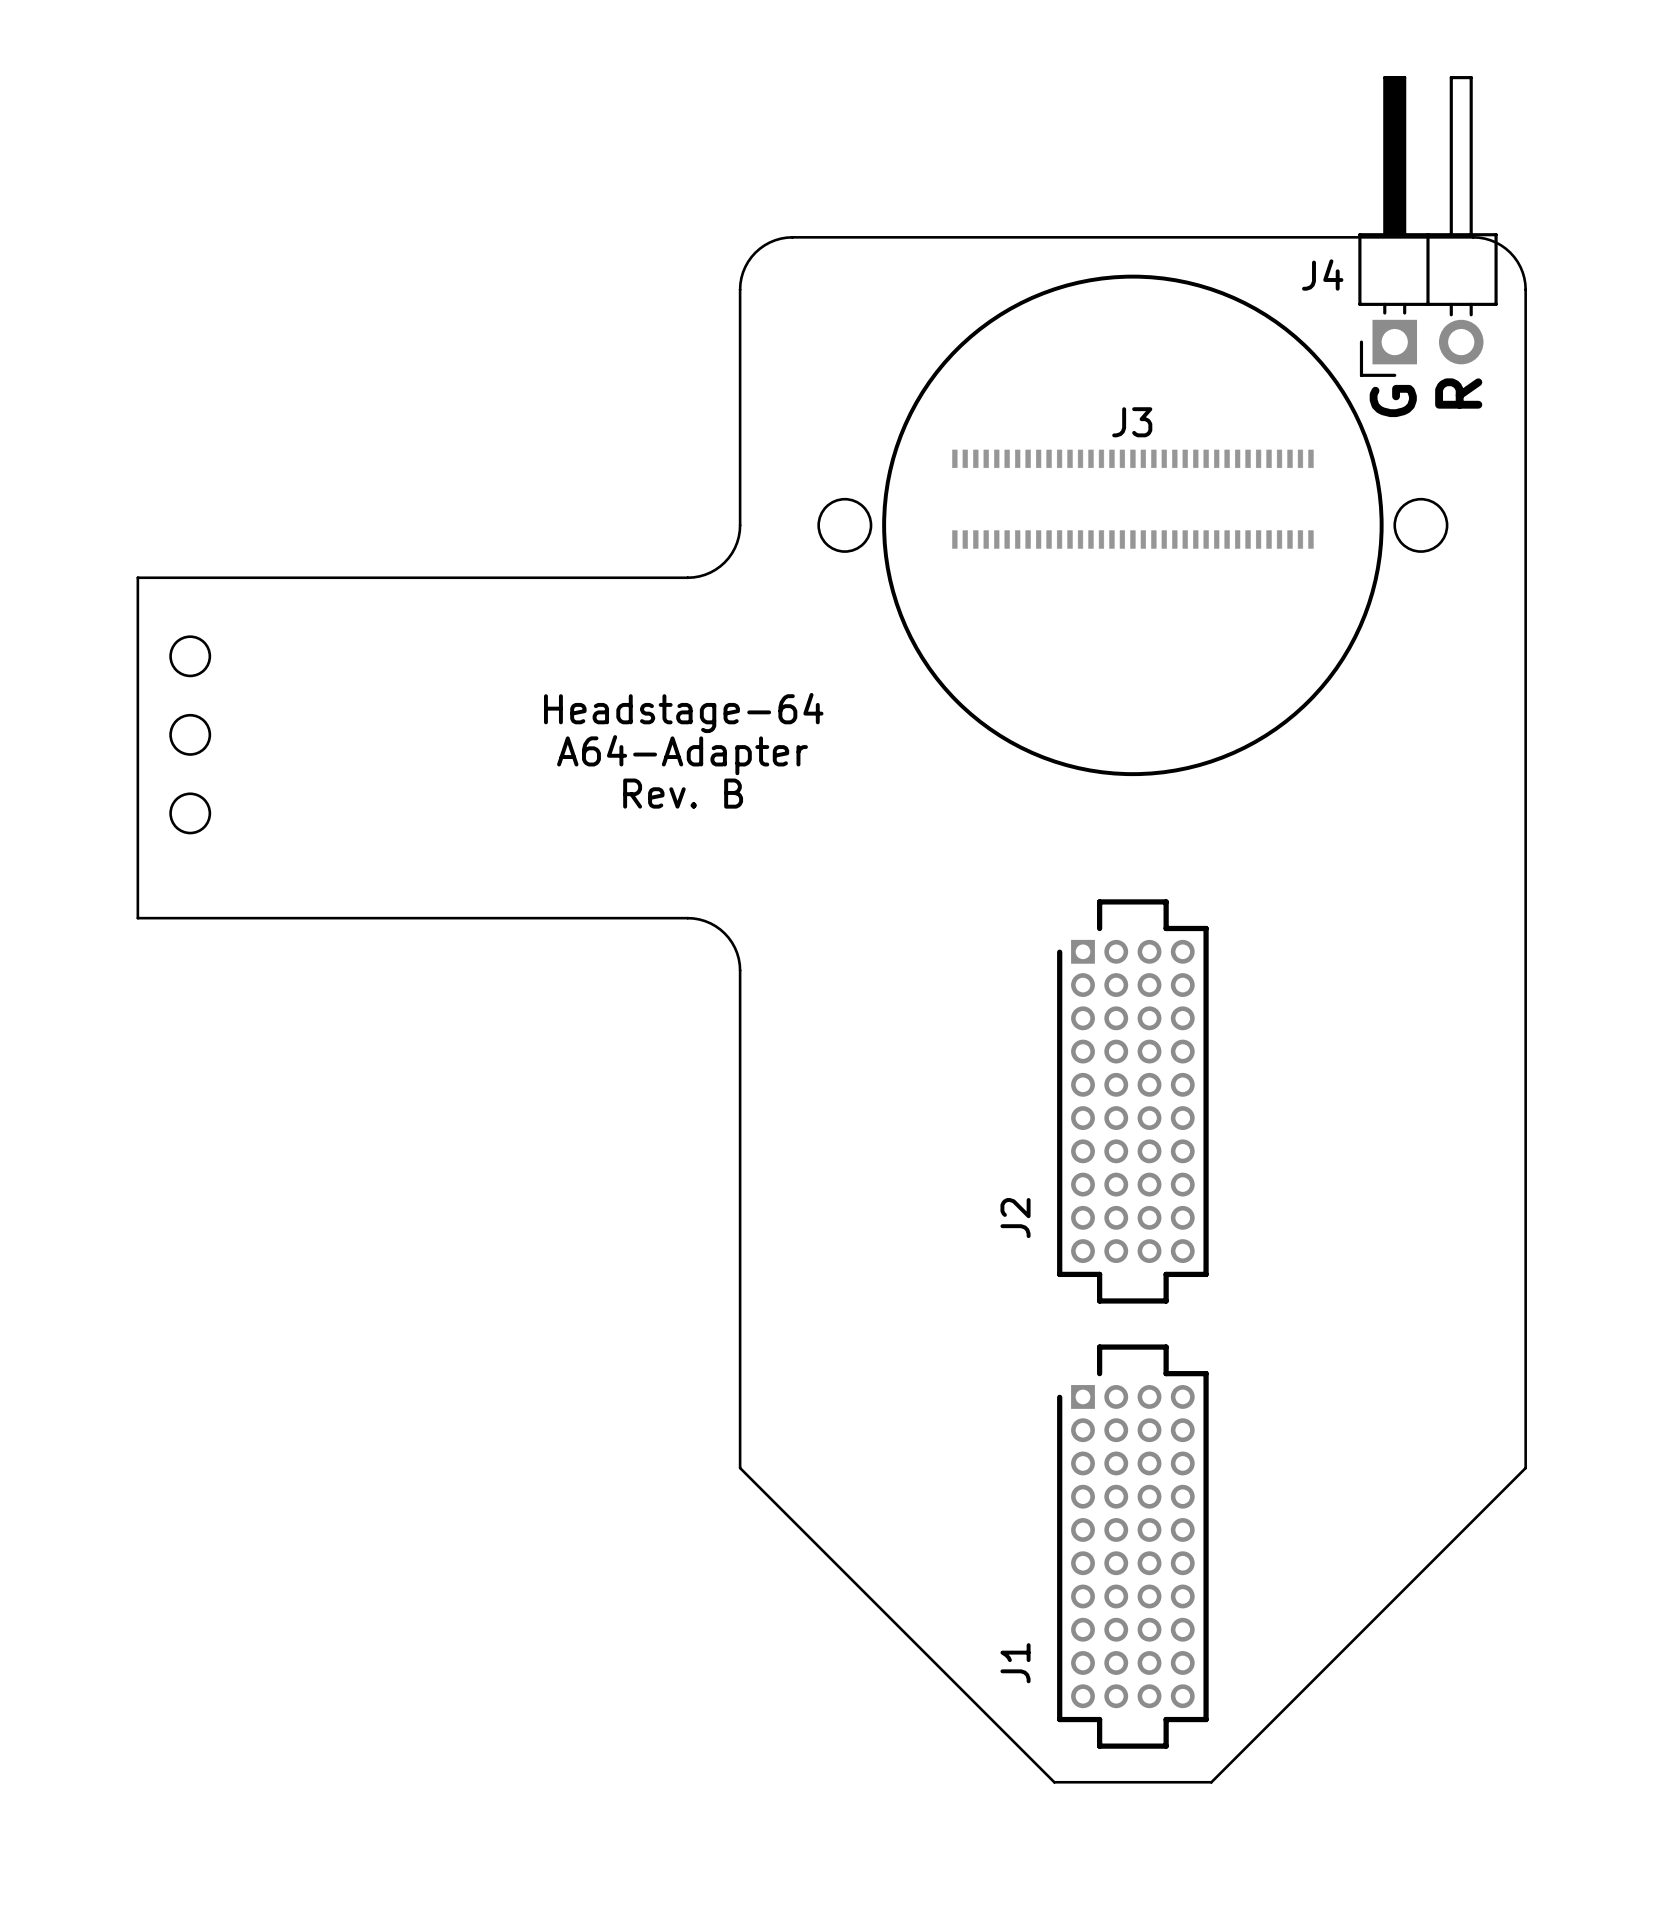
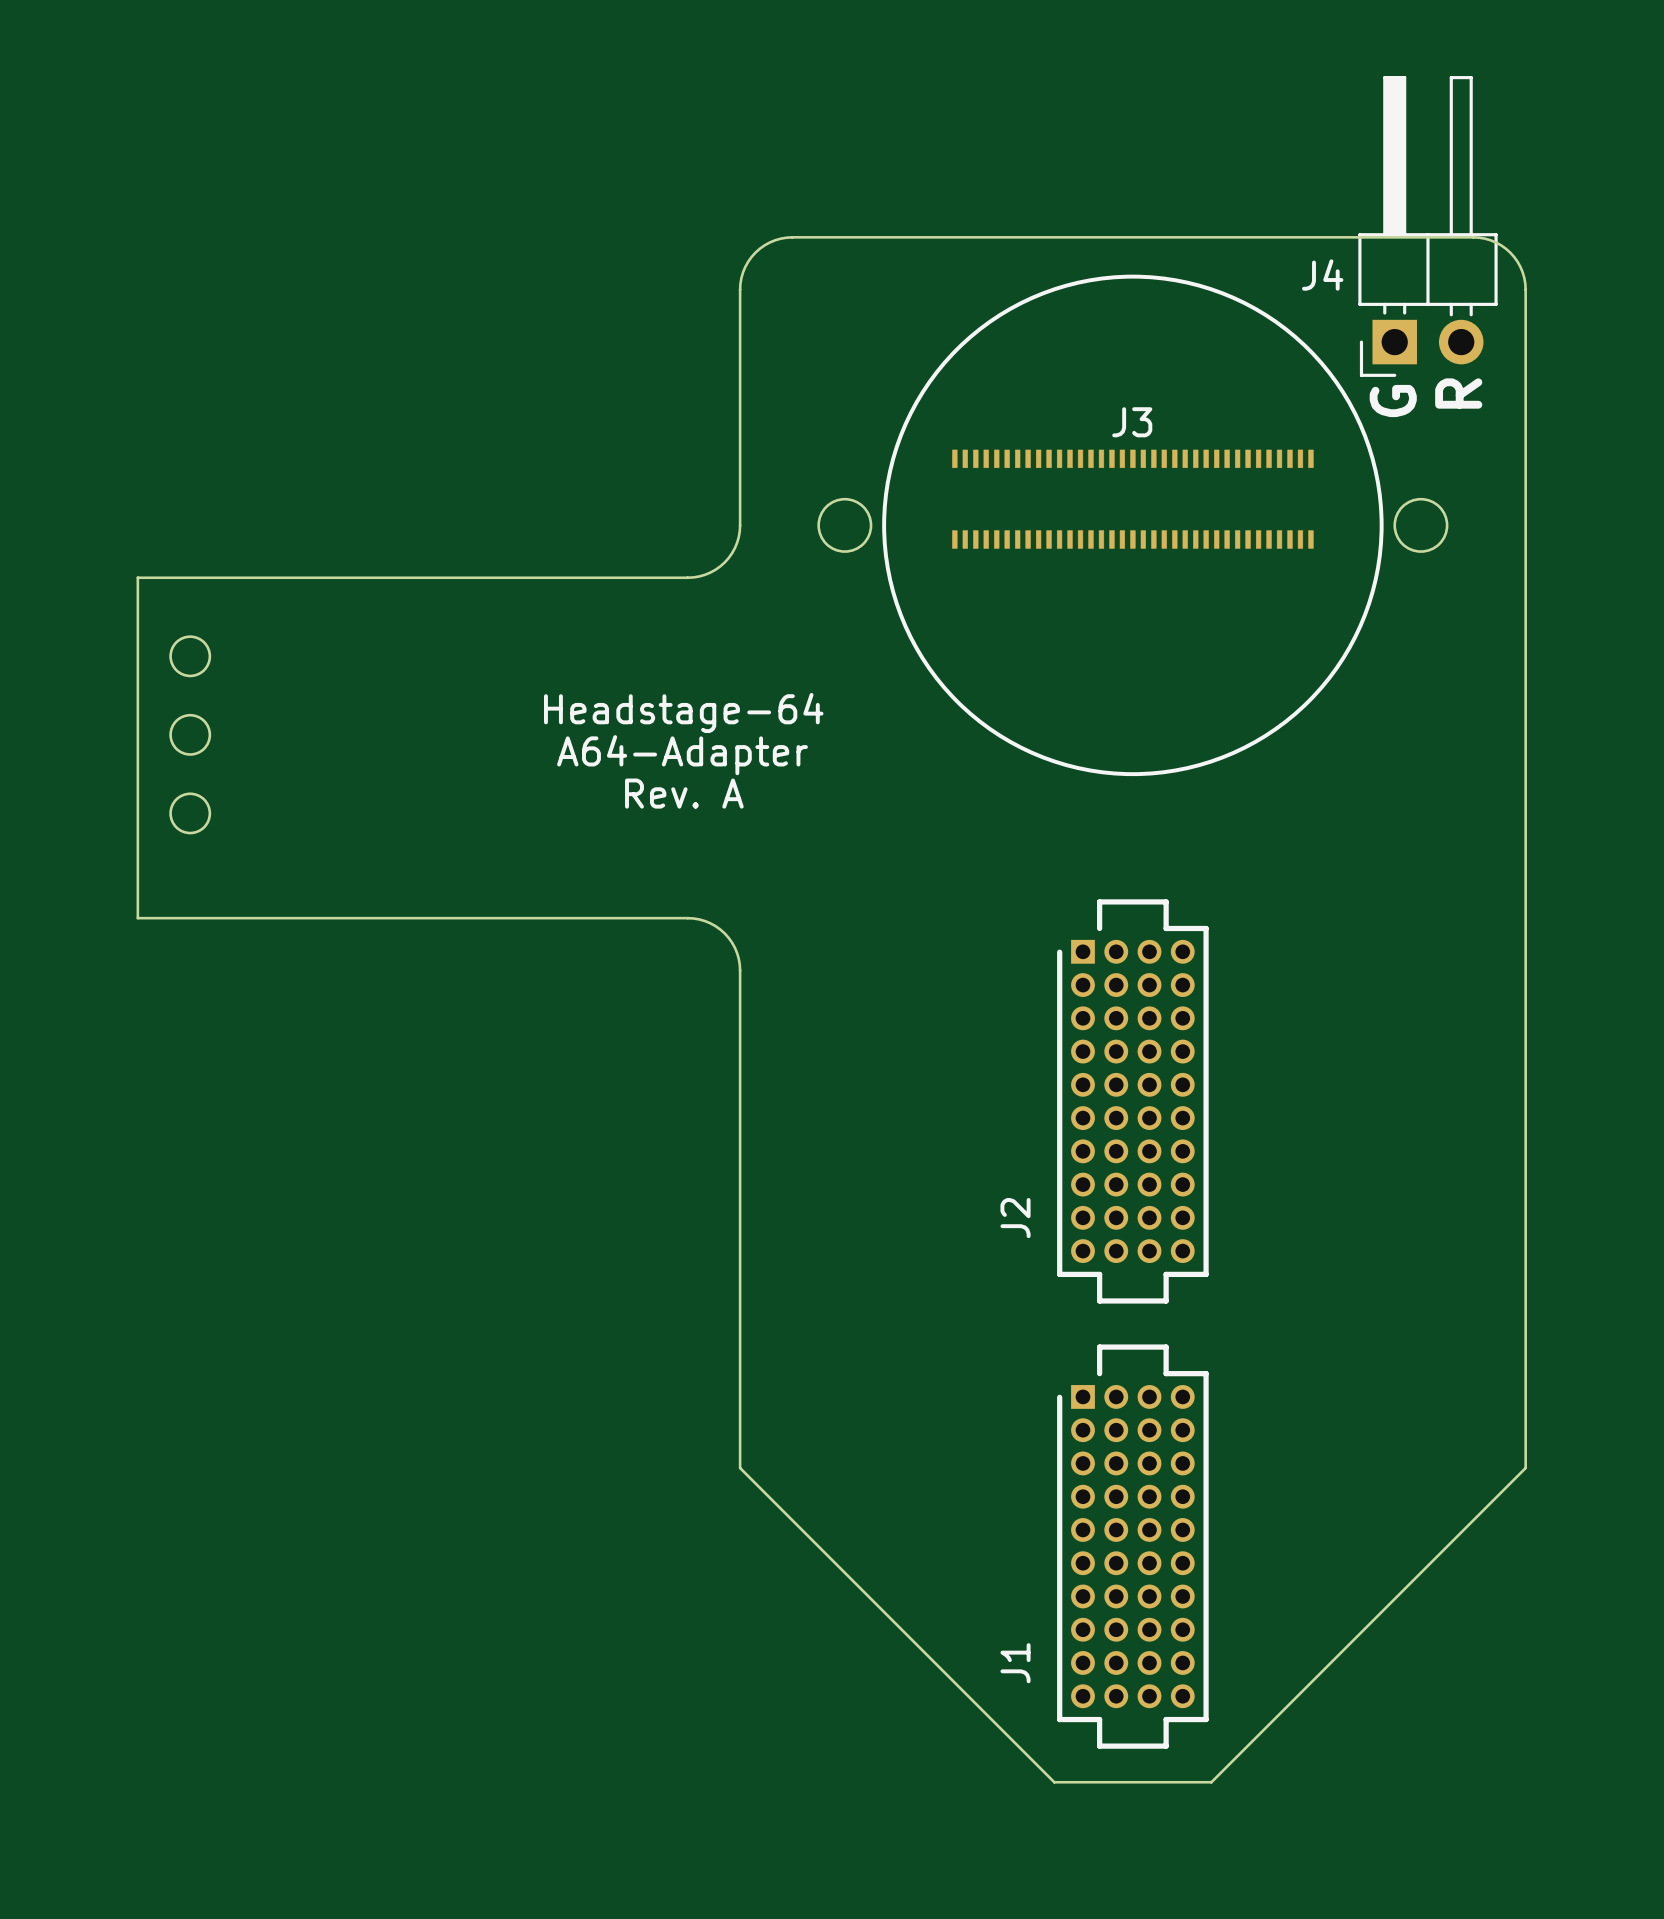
text: Rev. B (683, 793) -> Rev. A (684, 793)

